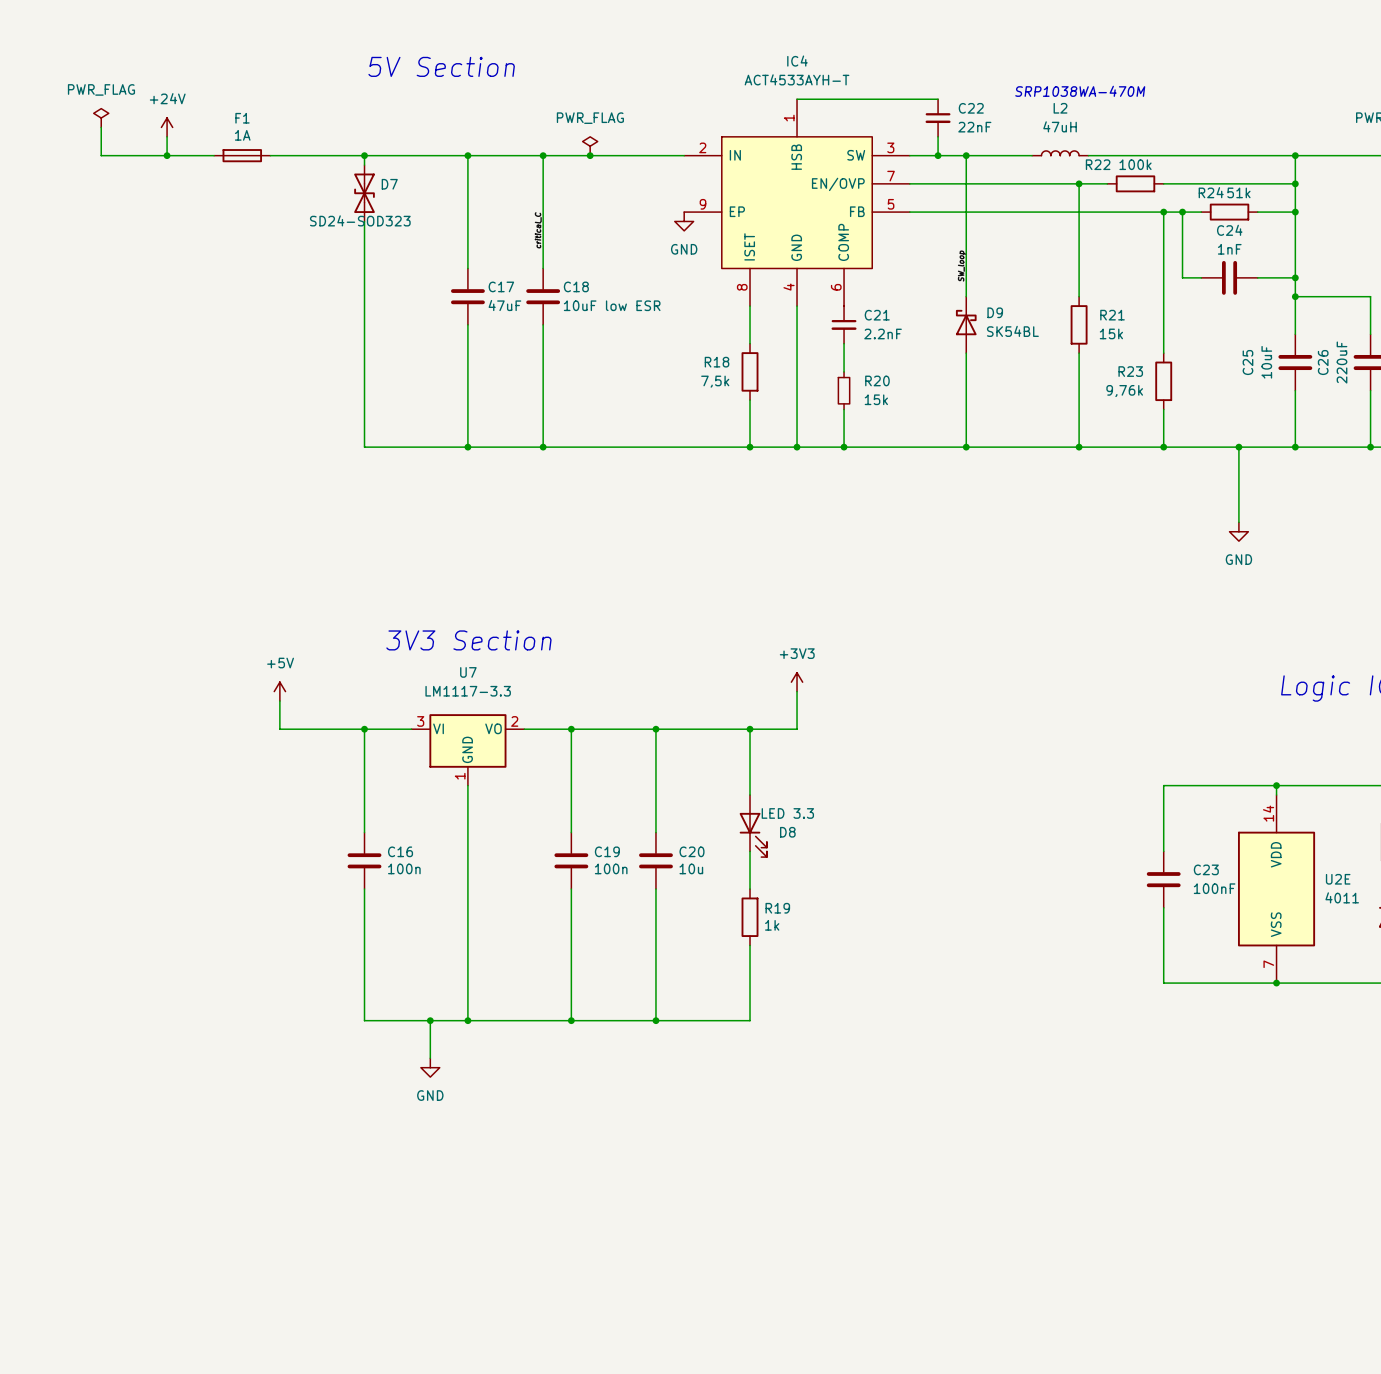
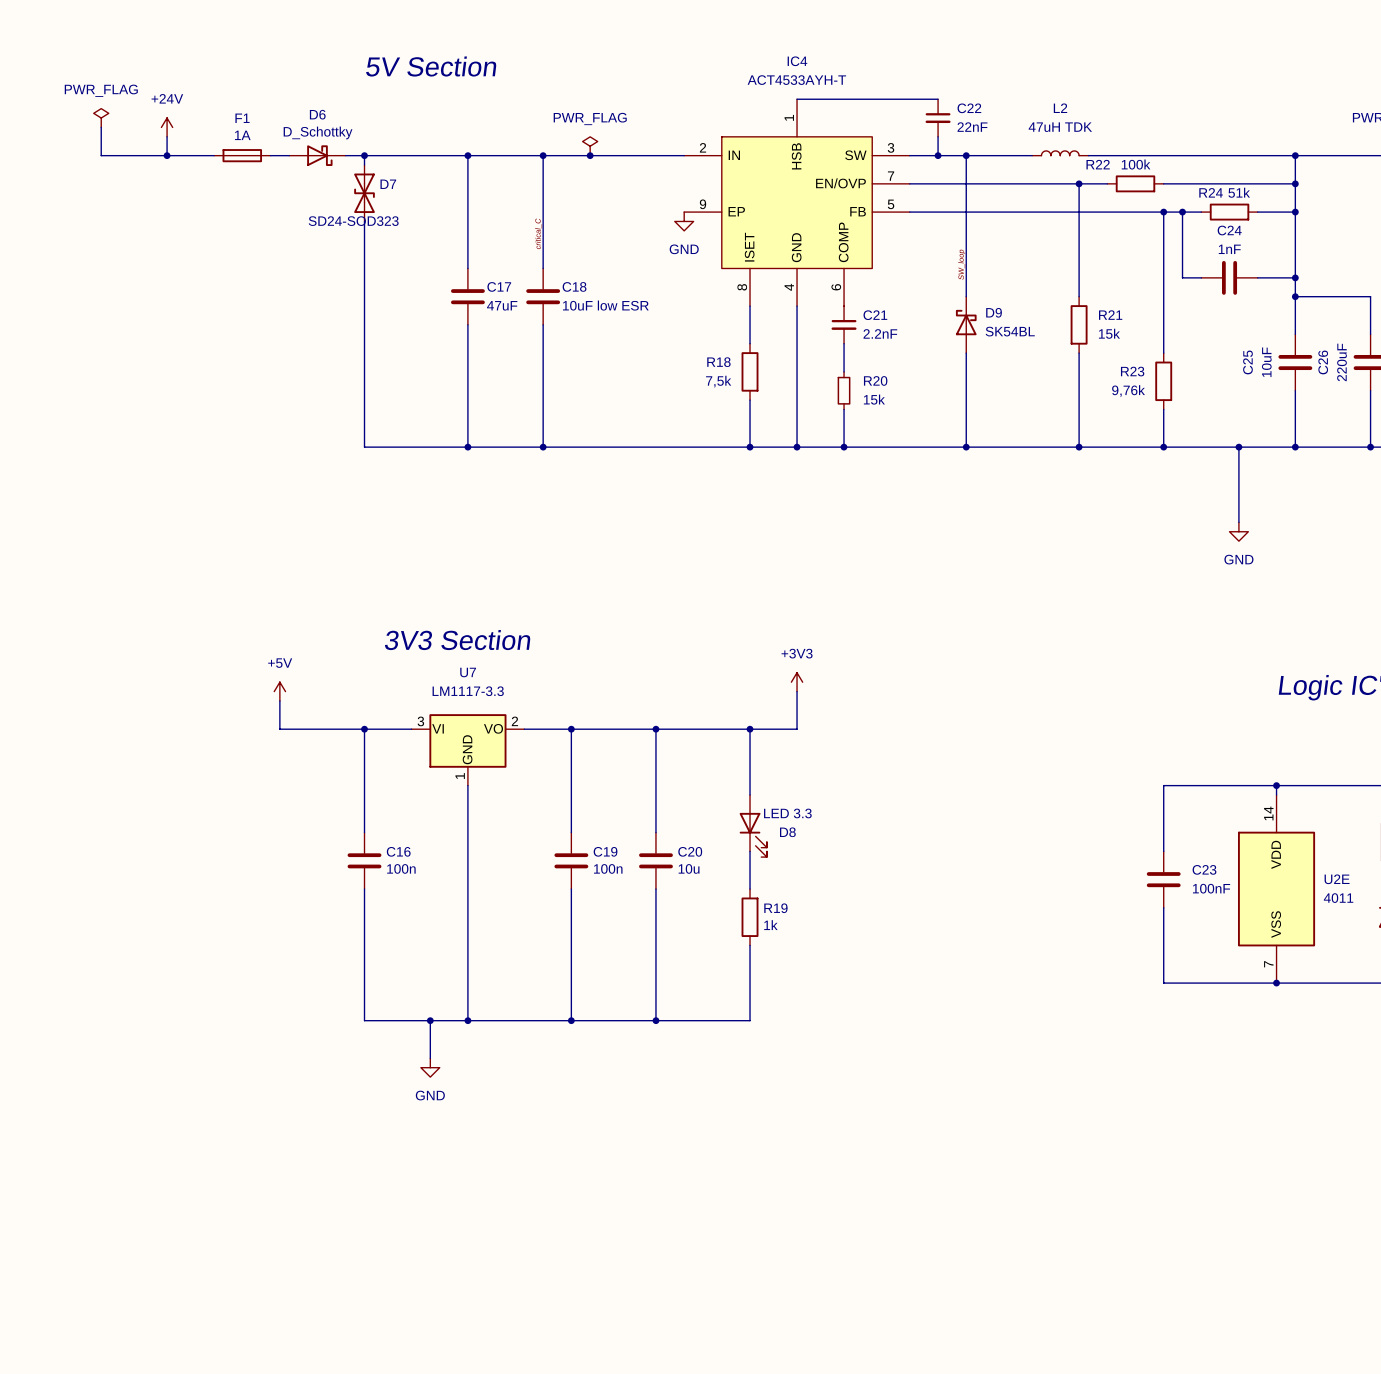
text: SRP1038WA-470M (1080, 91) -> none
L2 value: 47uH (1060, 126) -> 47uH TDK (1060, 127)
D6: none -> D_Schottky (317, 155)

